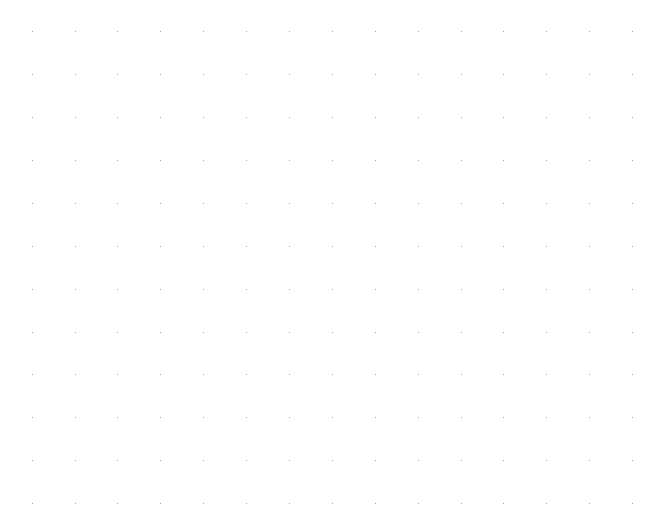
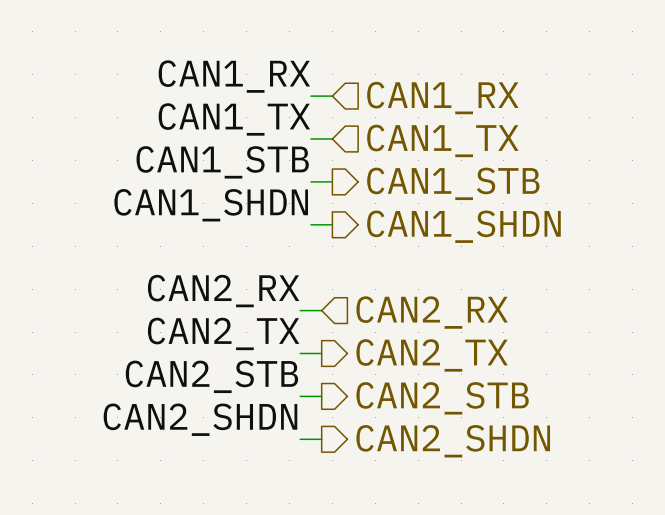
label: none -> CAN1_RX (234, 76)
wire: none -> (310, 96) (332, 96)
hierarchical label: none -> CAN1_RX (442, 98)
label: none -> CAN1_TX (234, 119)
wire: none -> (310, 139) (332, 139)
hierarchical label: none -> CAN1_TX (442, 140)
label: none -> CAN1_STB (222, 162)
wire: none -> (310, 181) (332, 181)
hierarchical label: none -> CAN1_STB (453, 183)
label: none -> CAN1_SHDN (211, 205)
wire: none -> (310, 224) (332, 224)
hierarchical label: none -> CAN1_SHDN (463, 226)
label: none -> CAN2_RX (223, 291)
wire: none -> (300, 310) (321, 310)
hierarchical label: none -> CAN2_RX (432, 312)
label: none -> CAN2_TX (223, 333)
wire: none -> (300, 353) (321, 353)
hierarchical label: none -> CAN2_TX (432, 355)
label: none -> CAN2_STB (211, 376)
wire: none -> (300, 396) (321, 396)
hierarchical label: none -> CAN2_STB (442, 398)
label: none -> CAN2_SHDN (200, 419)
wire: none -> (300, 439) (321, 439)
hierarchical label: none -> CAN2_SHDN (453, 441)

